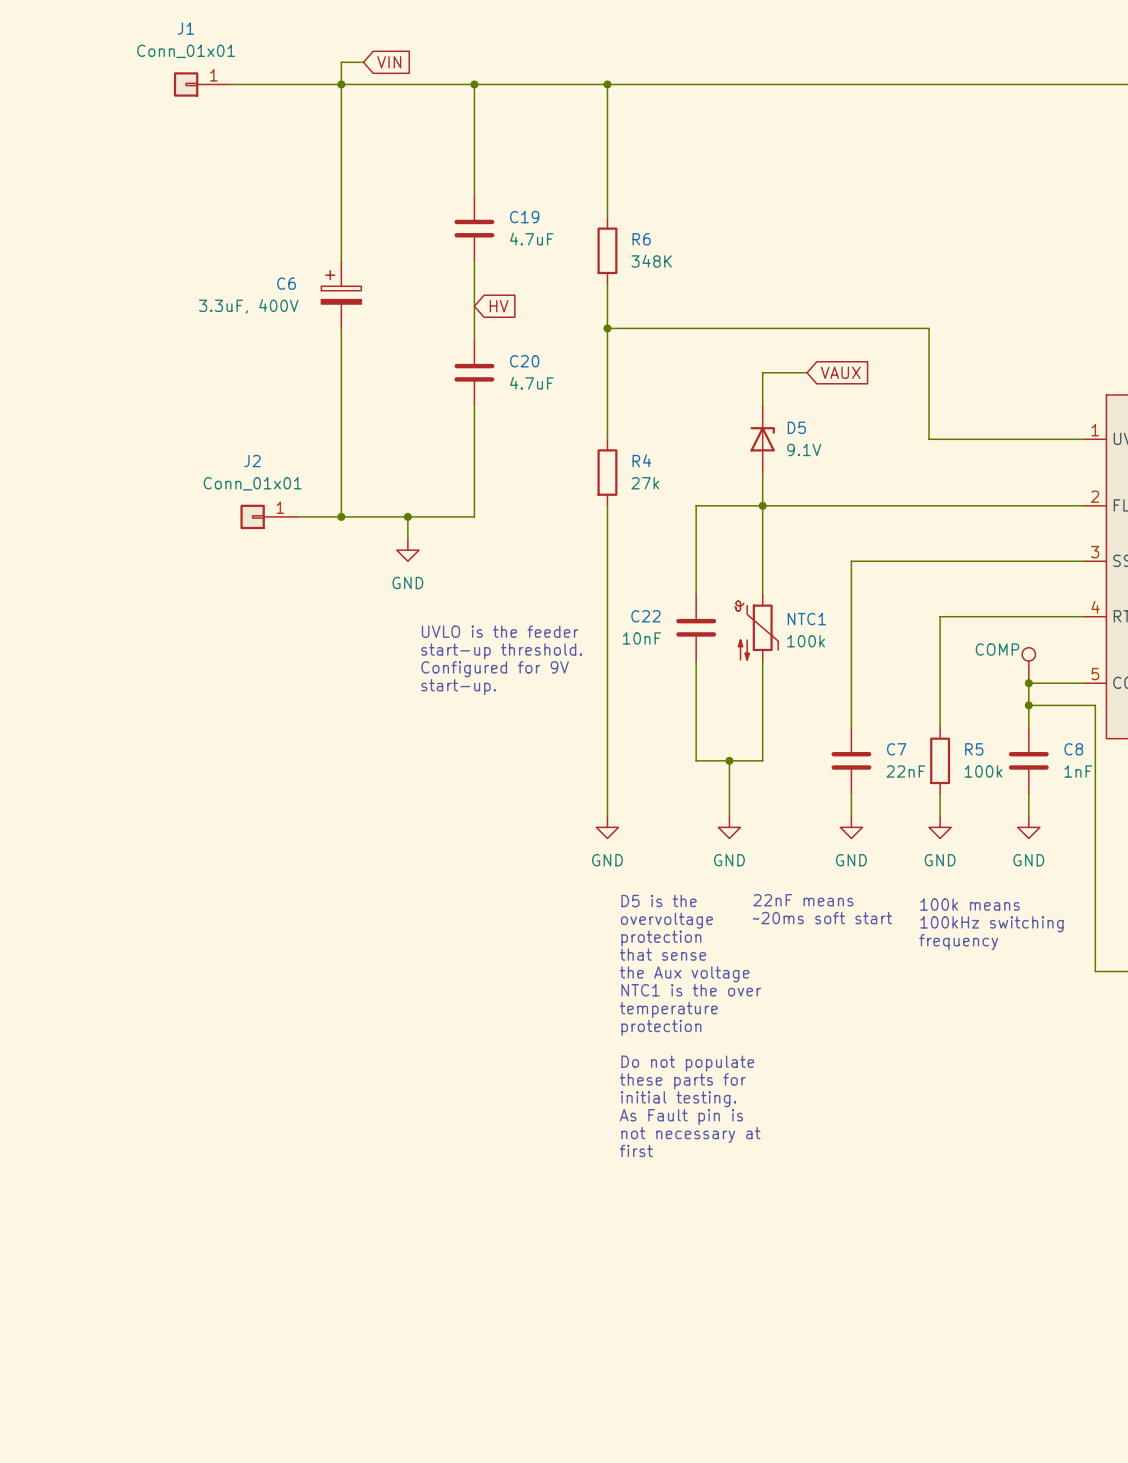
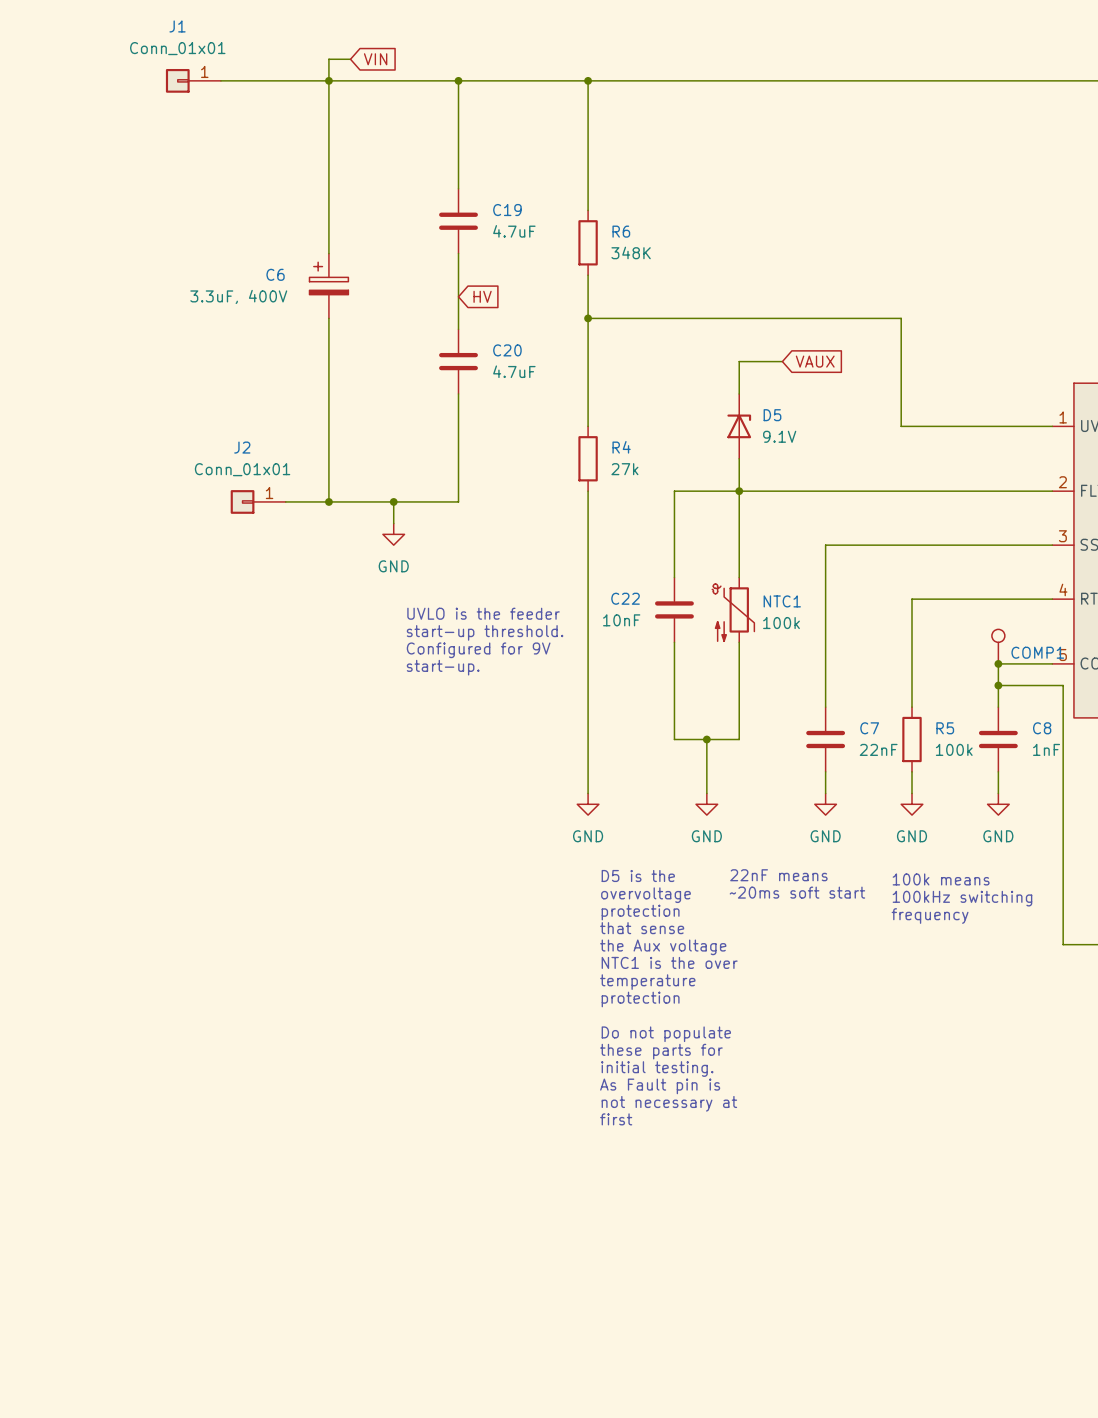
COMP1 value: COMP (997, 649) -> none
COMP1 name: none -> COMP1 (1037, 652)

